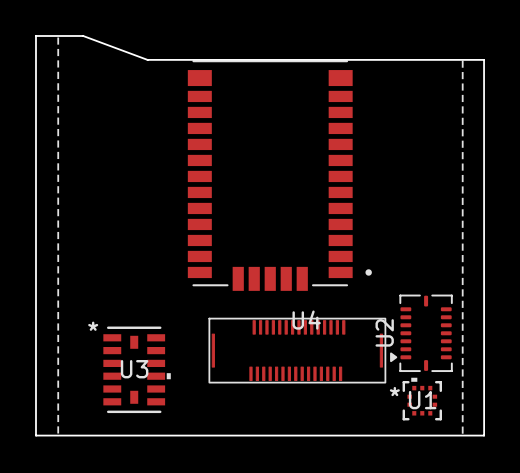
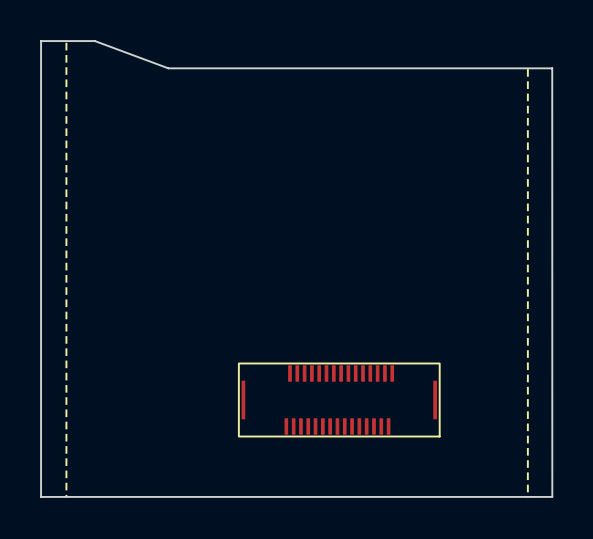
U4: (279, 175) -> none
U2: (421, 333) -> none
U3: (137, 369) -> none
U1: (422, 399) -> none

